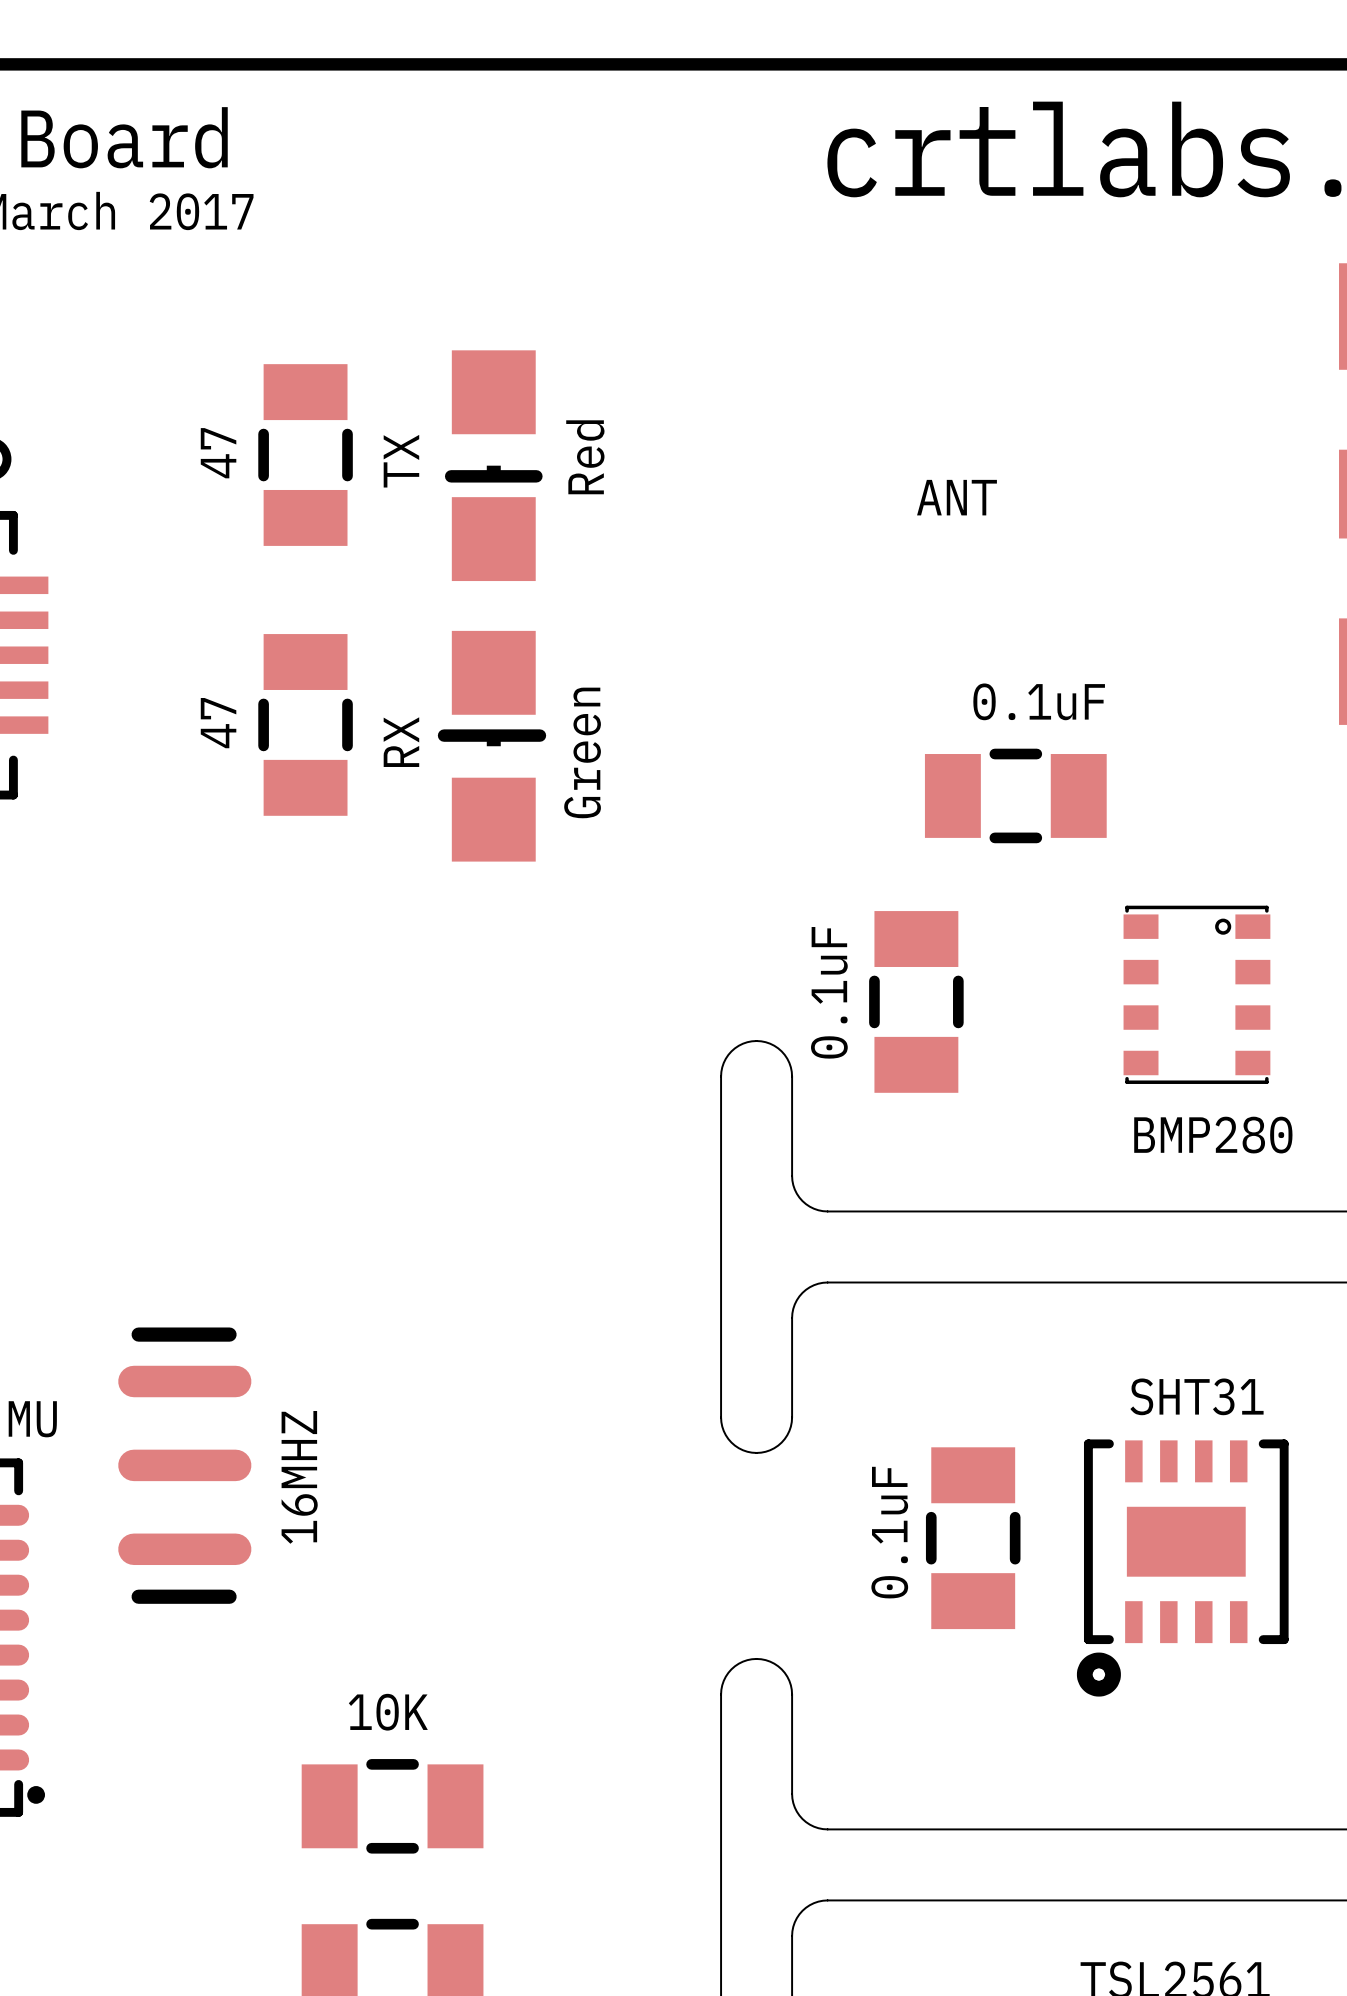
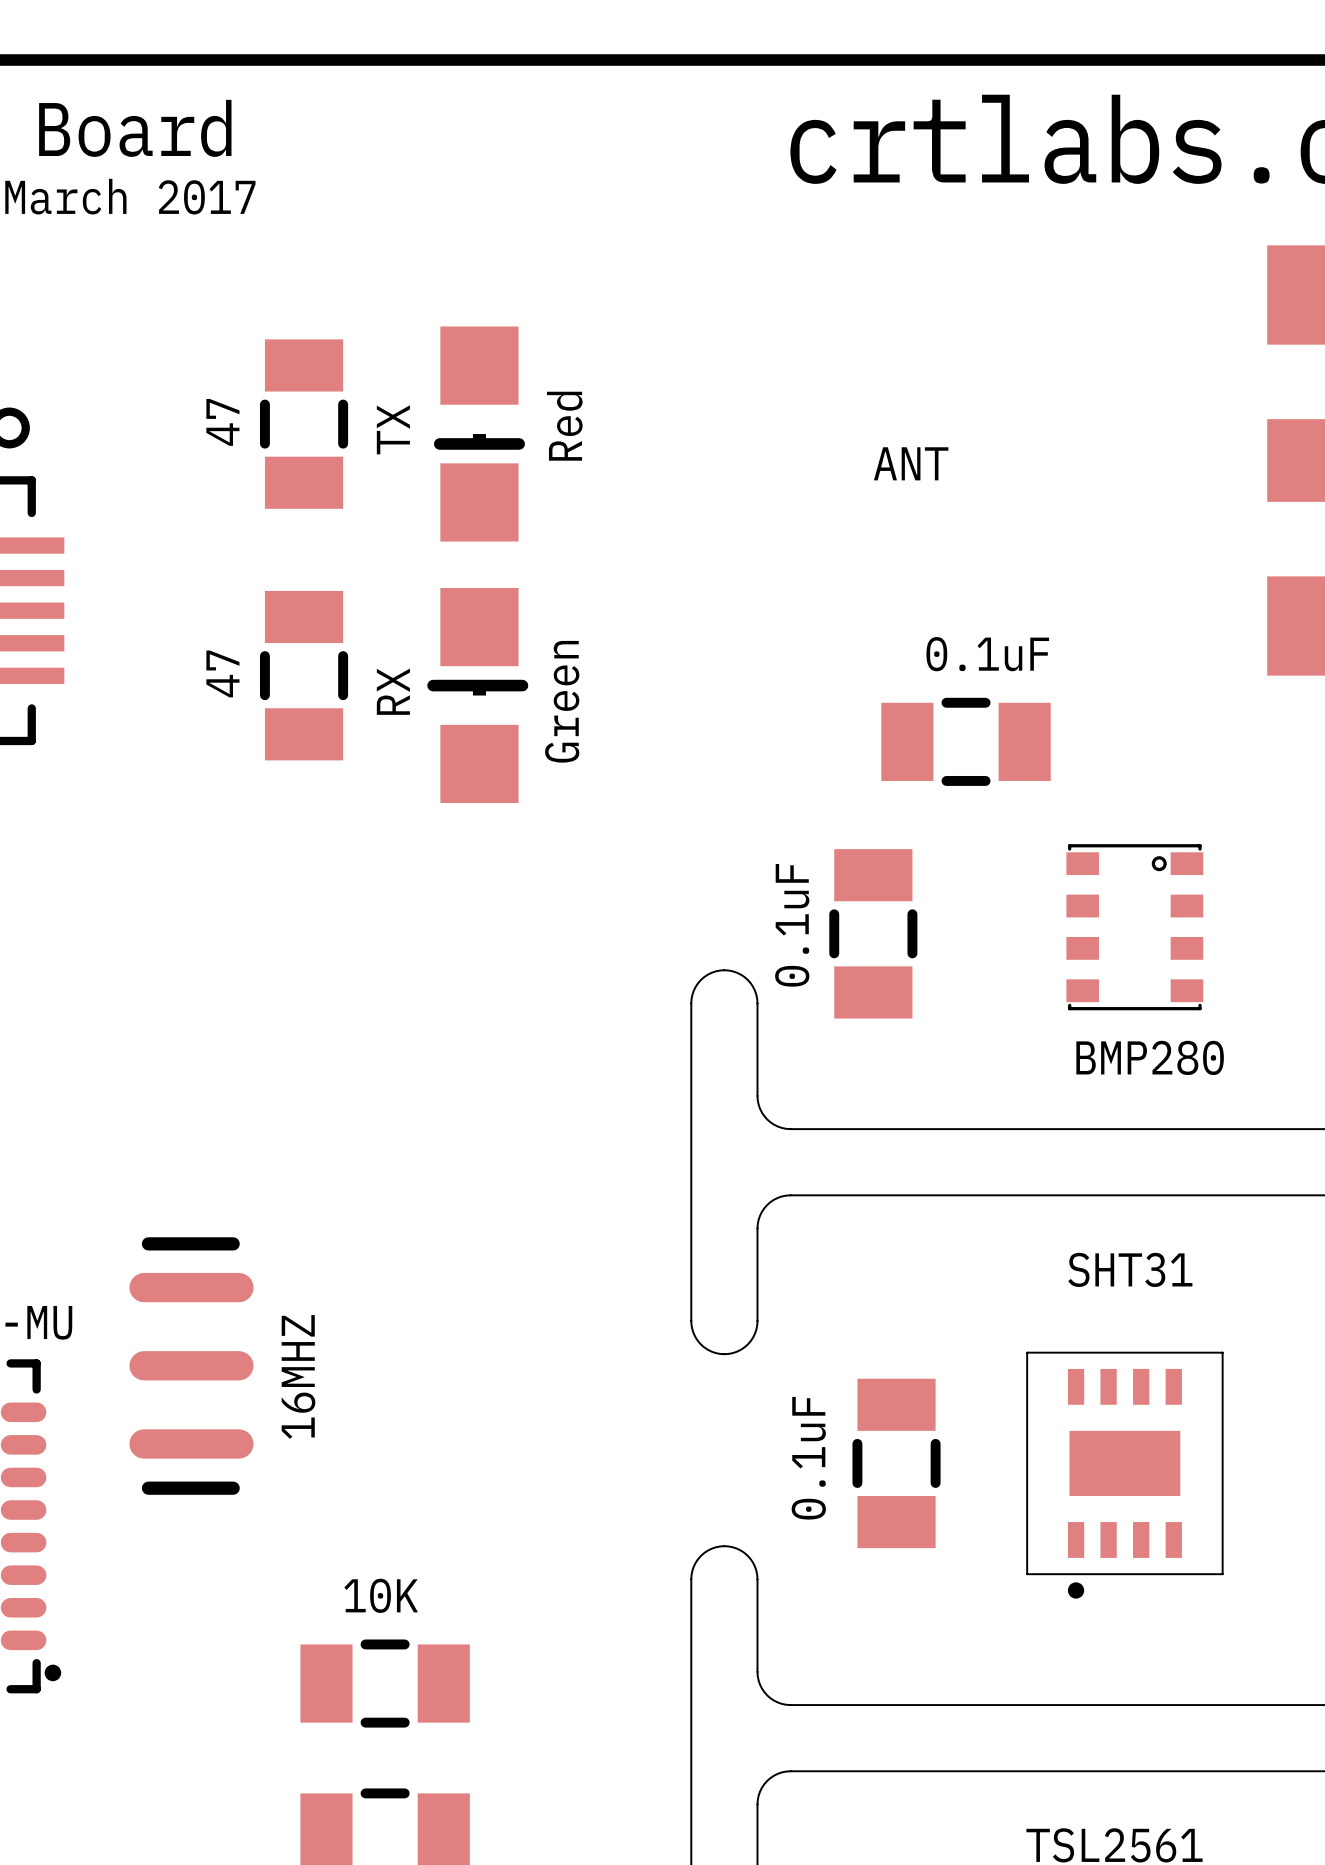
part footprint: [1076, 1439, 1289, 1697] -> [1026, 1352, 1223, 1599]
part value position: 0.1uF (889, 1532) -> 0.1uF (808, 1458)
part position: (973, 1538) -> (896, 1463)

